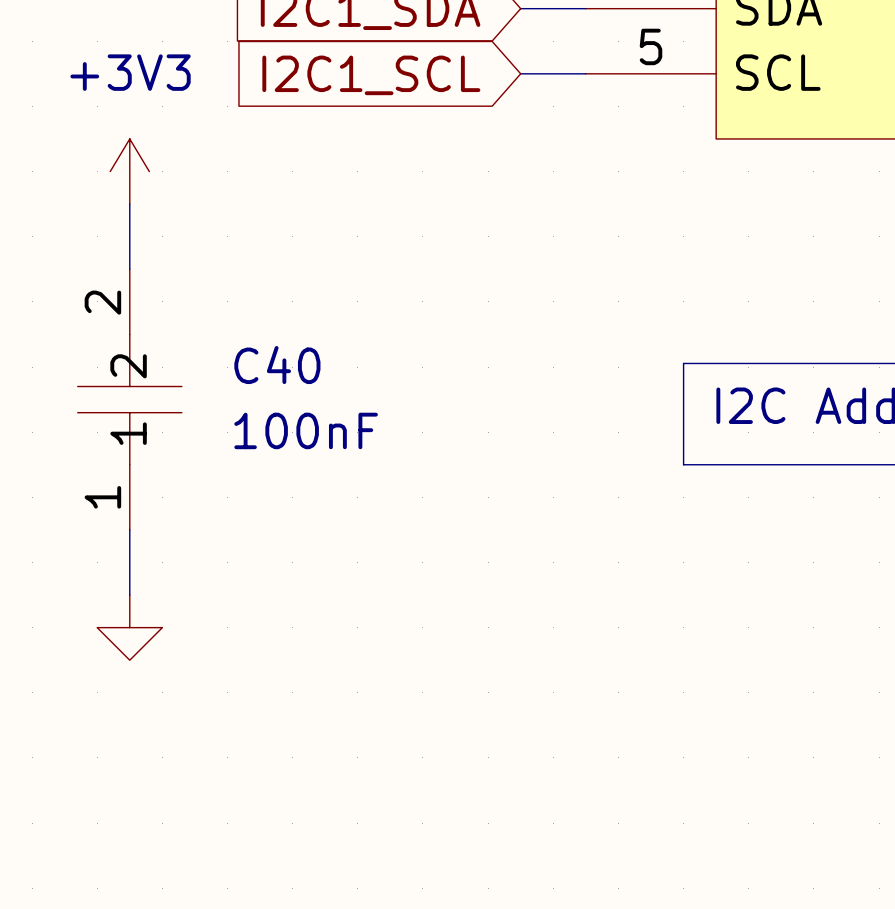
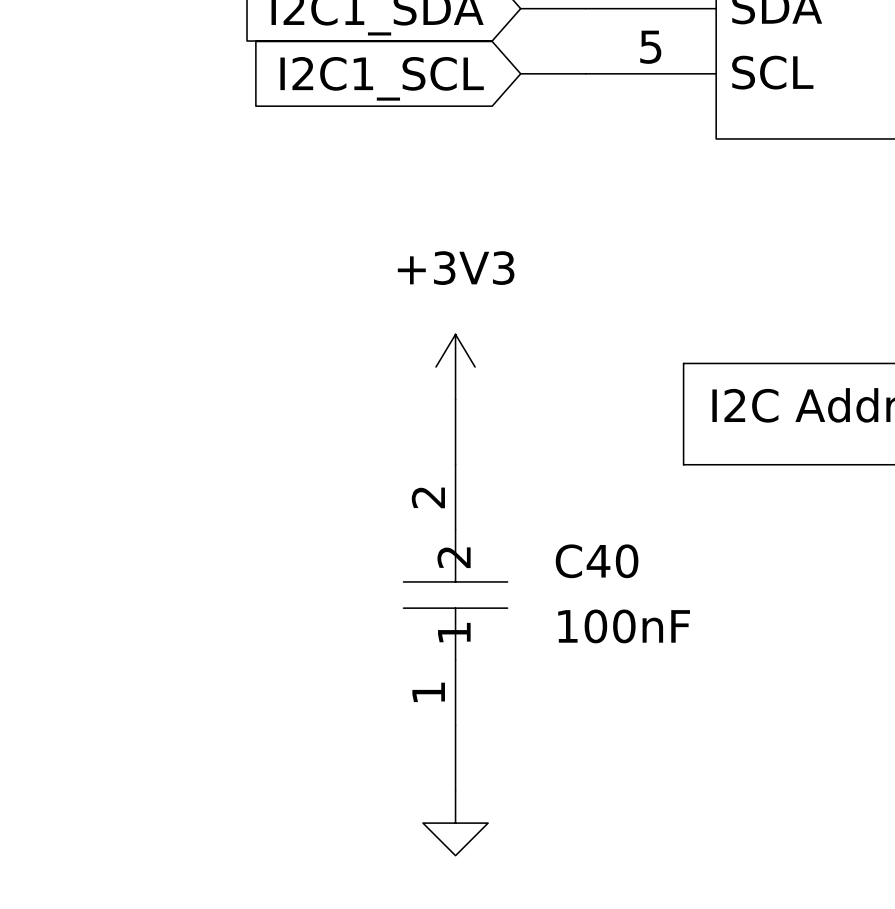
power symbol position: +3V3 (129, 171) -> +3V3 (455, 367)
wire: (129, 204) (129, 269) -> (455, 399) (455, 464)
C40 position: (129, 399) -> (455, 595)
wire: (129, 529) (129, 595) -> (455, 725) (455, 790)
power symbol position: (129, 627) -> (455, 823)

